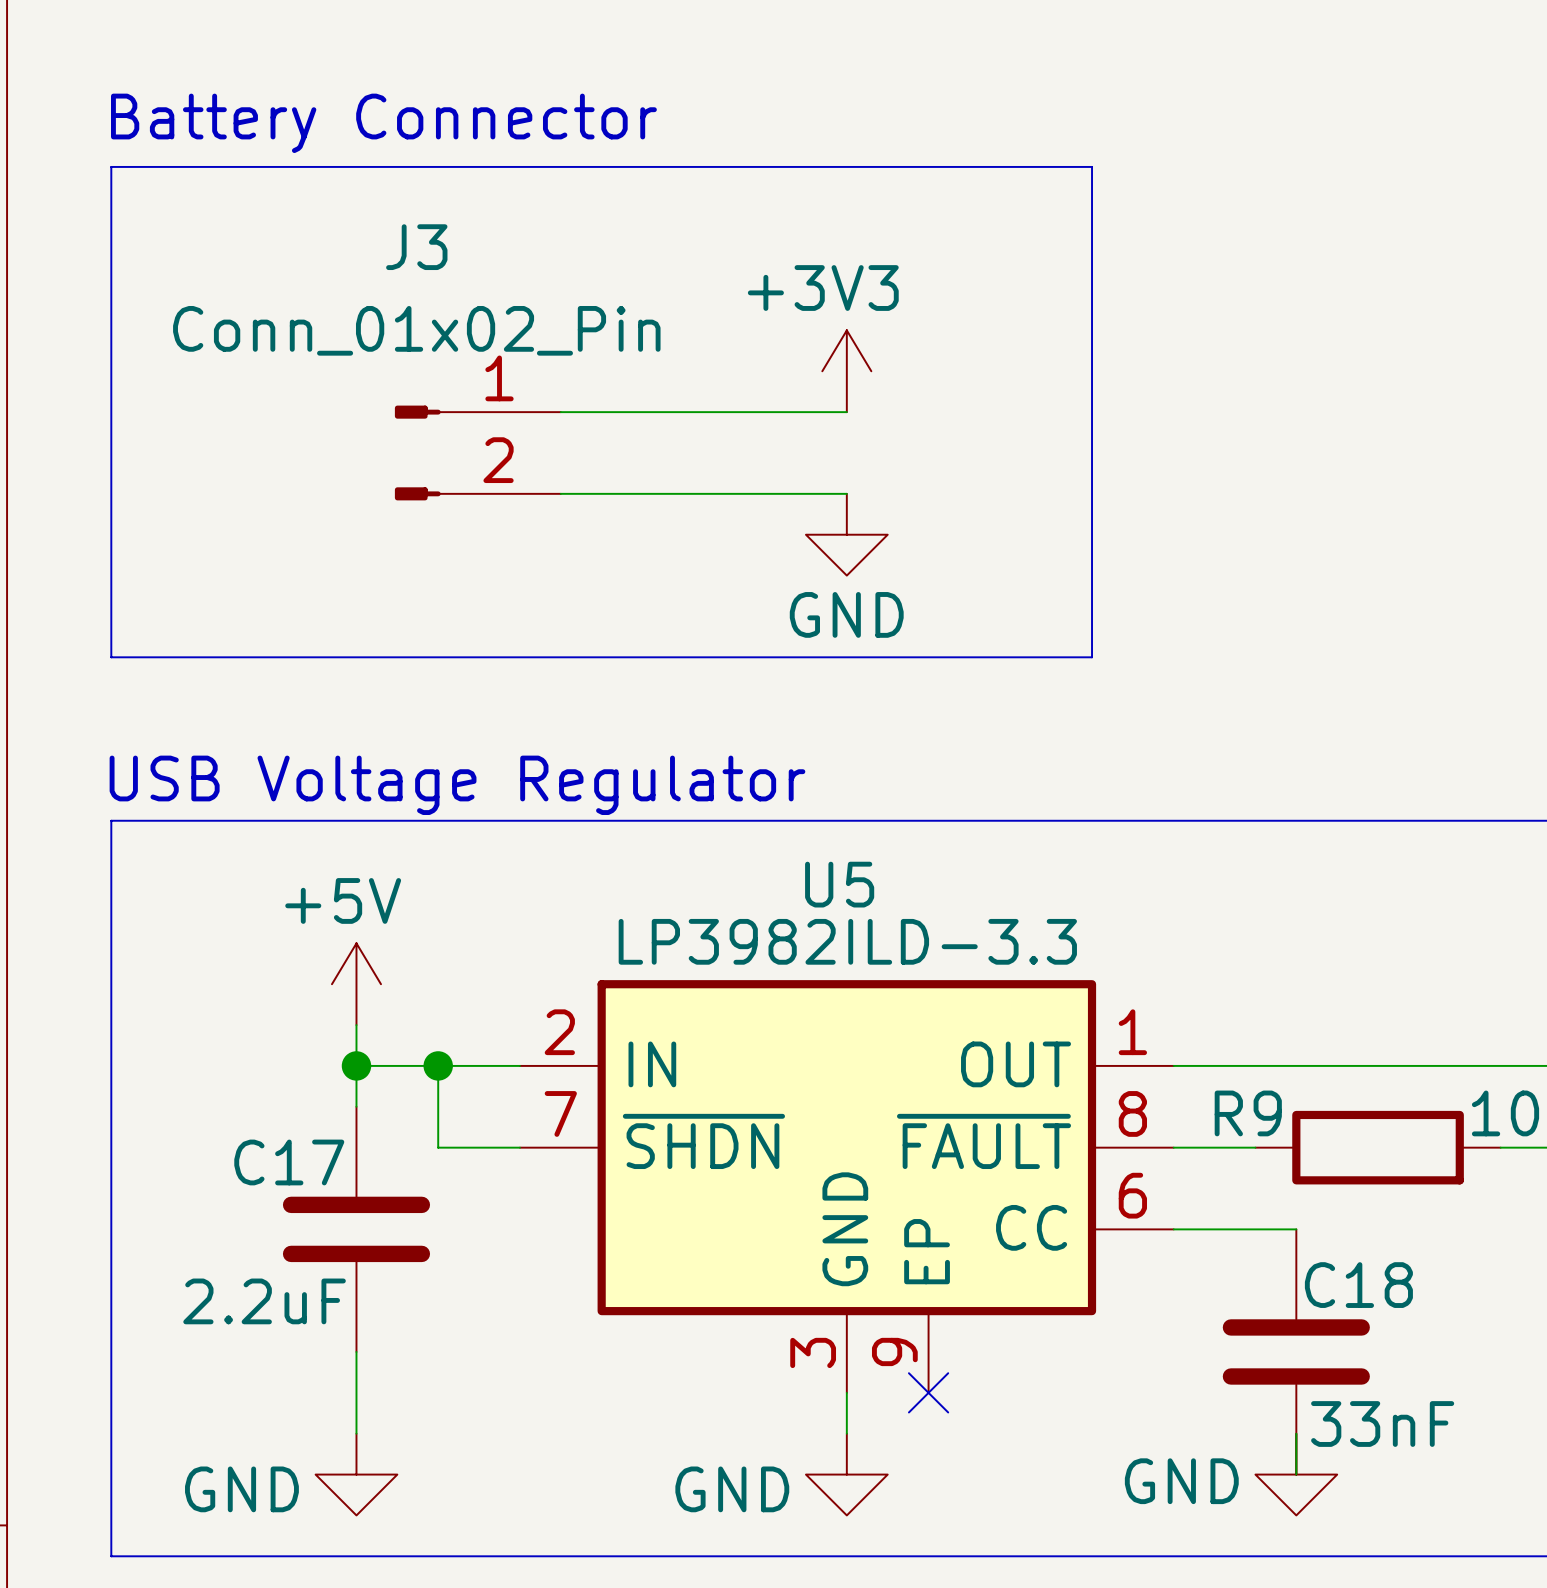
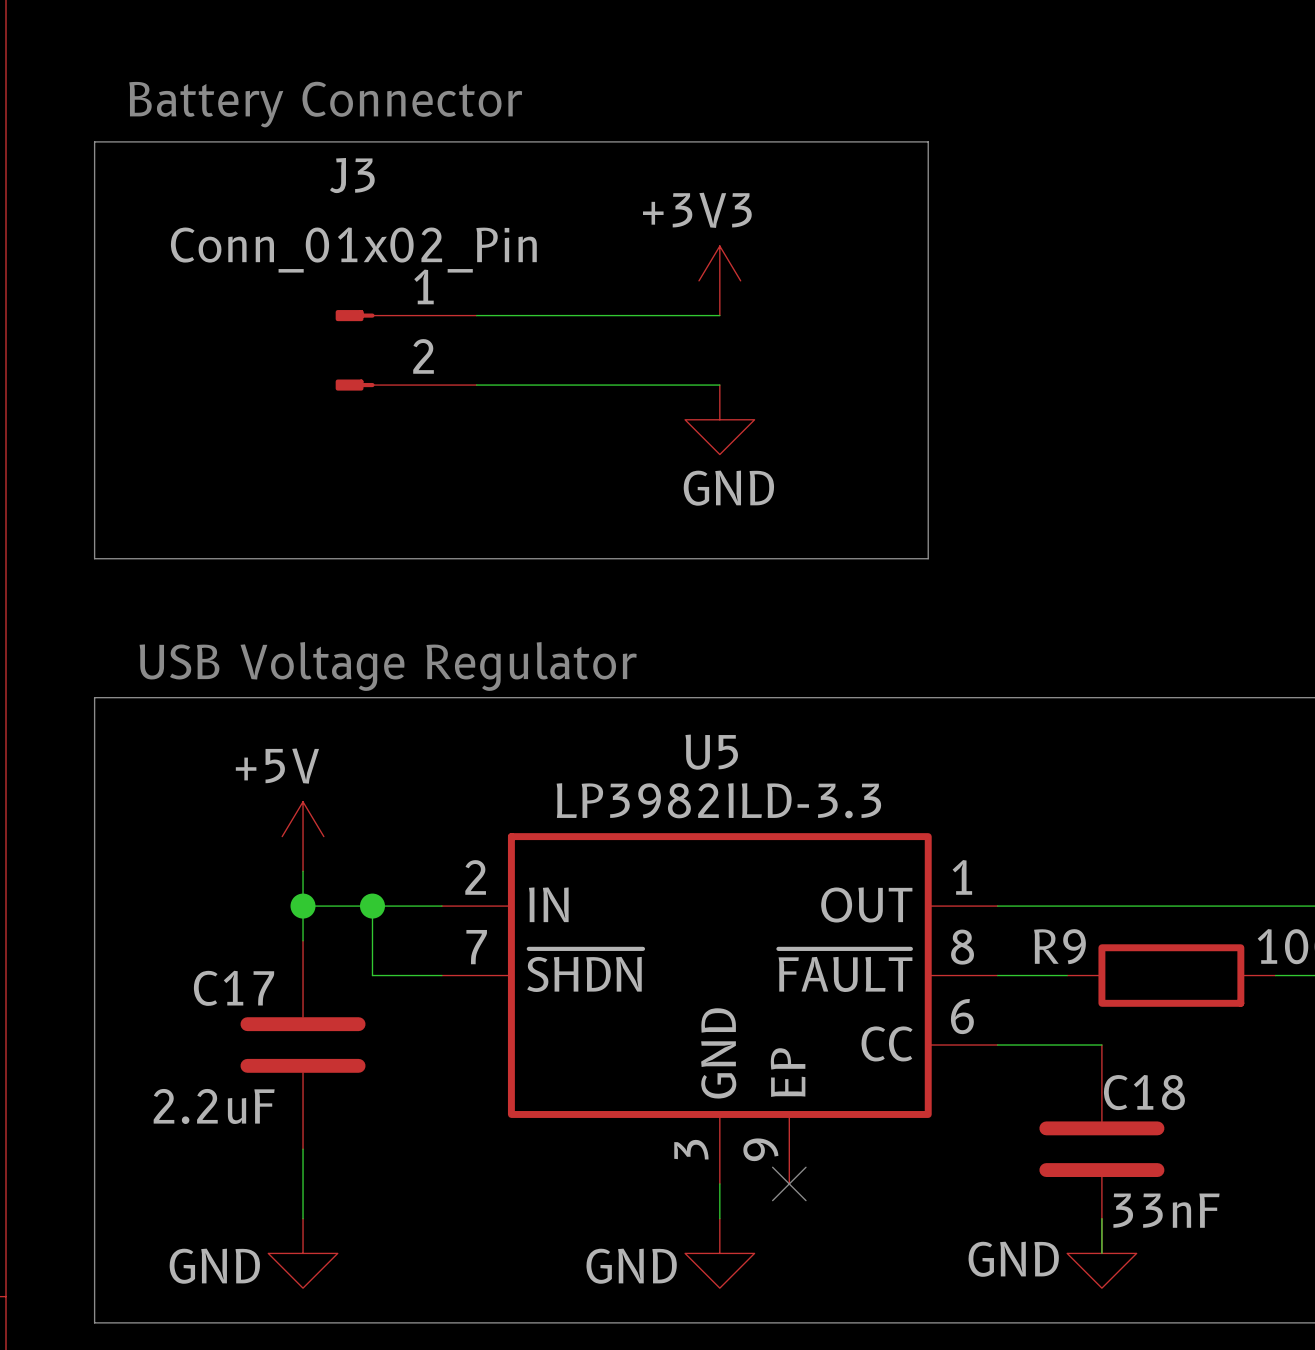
power symbol position: +3V3 (846, 371) -> +3V3 (719, 280)
wire: (560, 412) (846, 412) -> (476, 315) (719, 315)
J3 position: (477, 452) -> (406, 350)
wire: (560, 493) (846, 493) -> (476, 385) (719, 385)
power symbol position: GND (846, 534) -> GND (719, 419)

